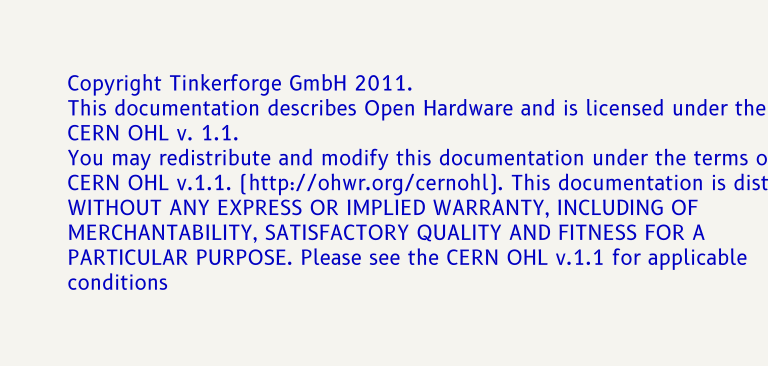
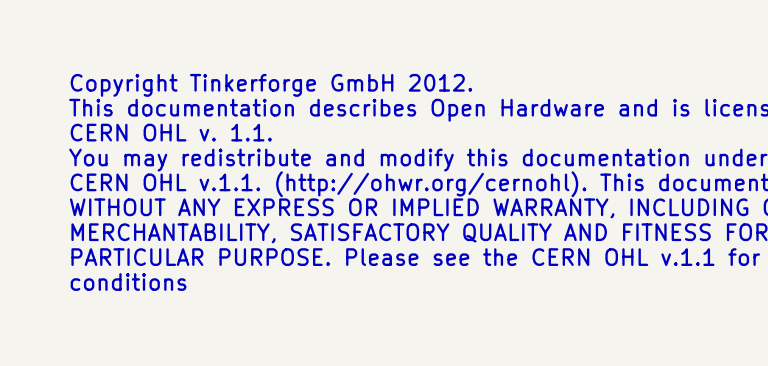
text: Copyright Tinkerforge GmbH 2011. (239, 84) -> Copyright Tinkerforge GmbH 2012. (271, 85)

